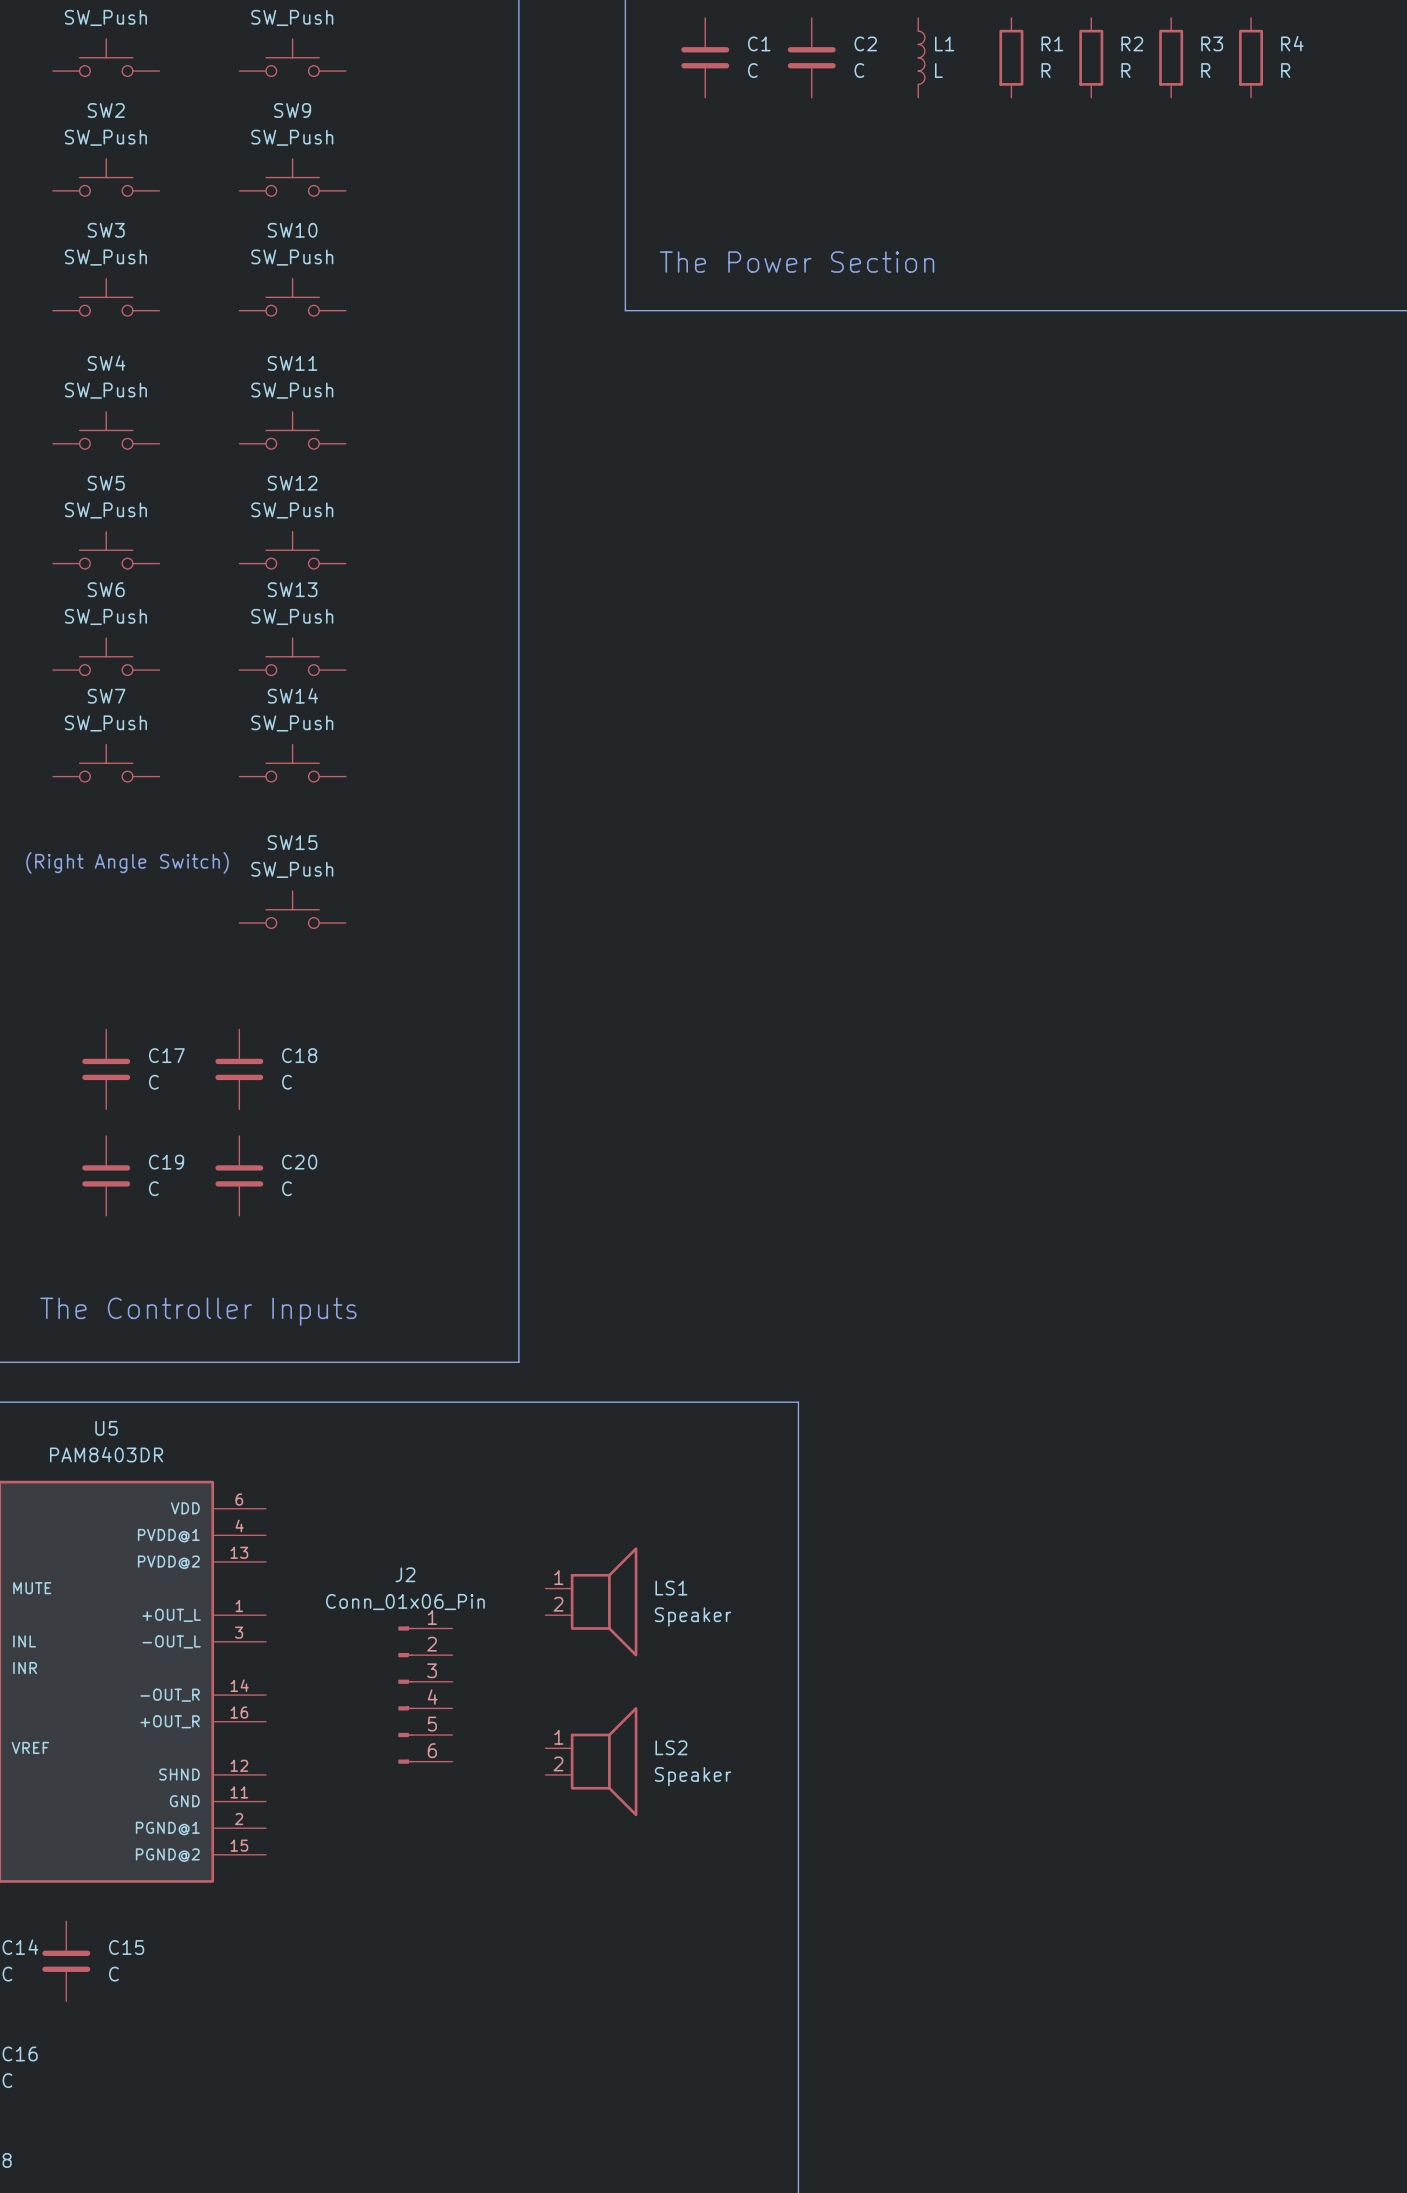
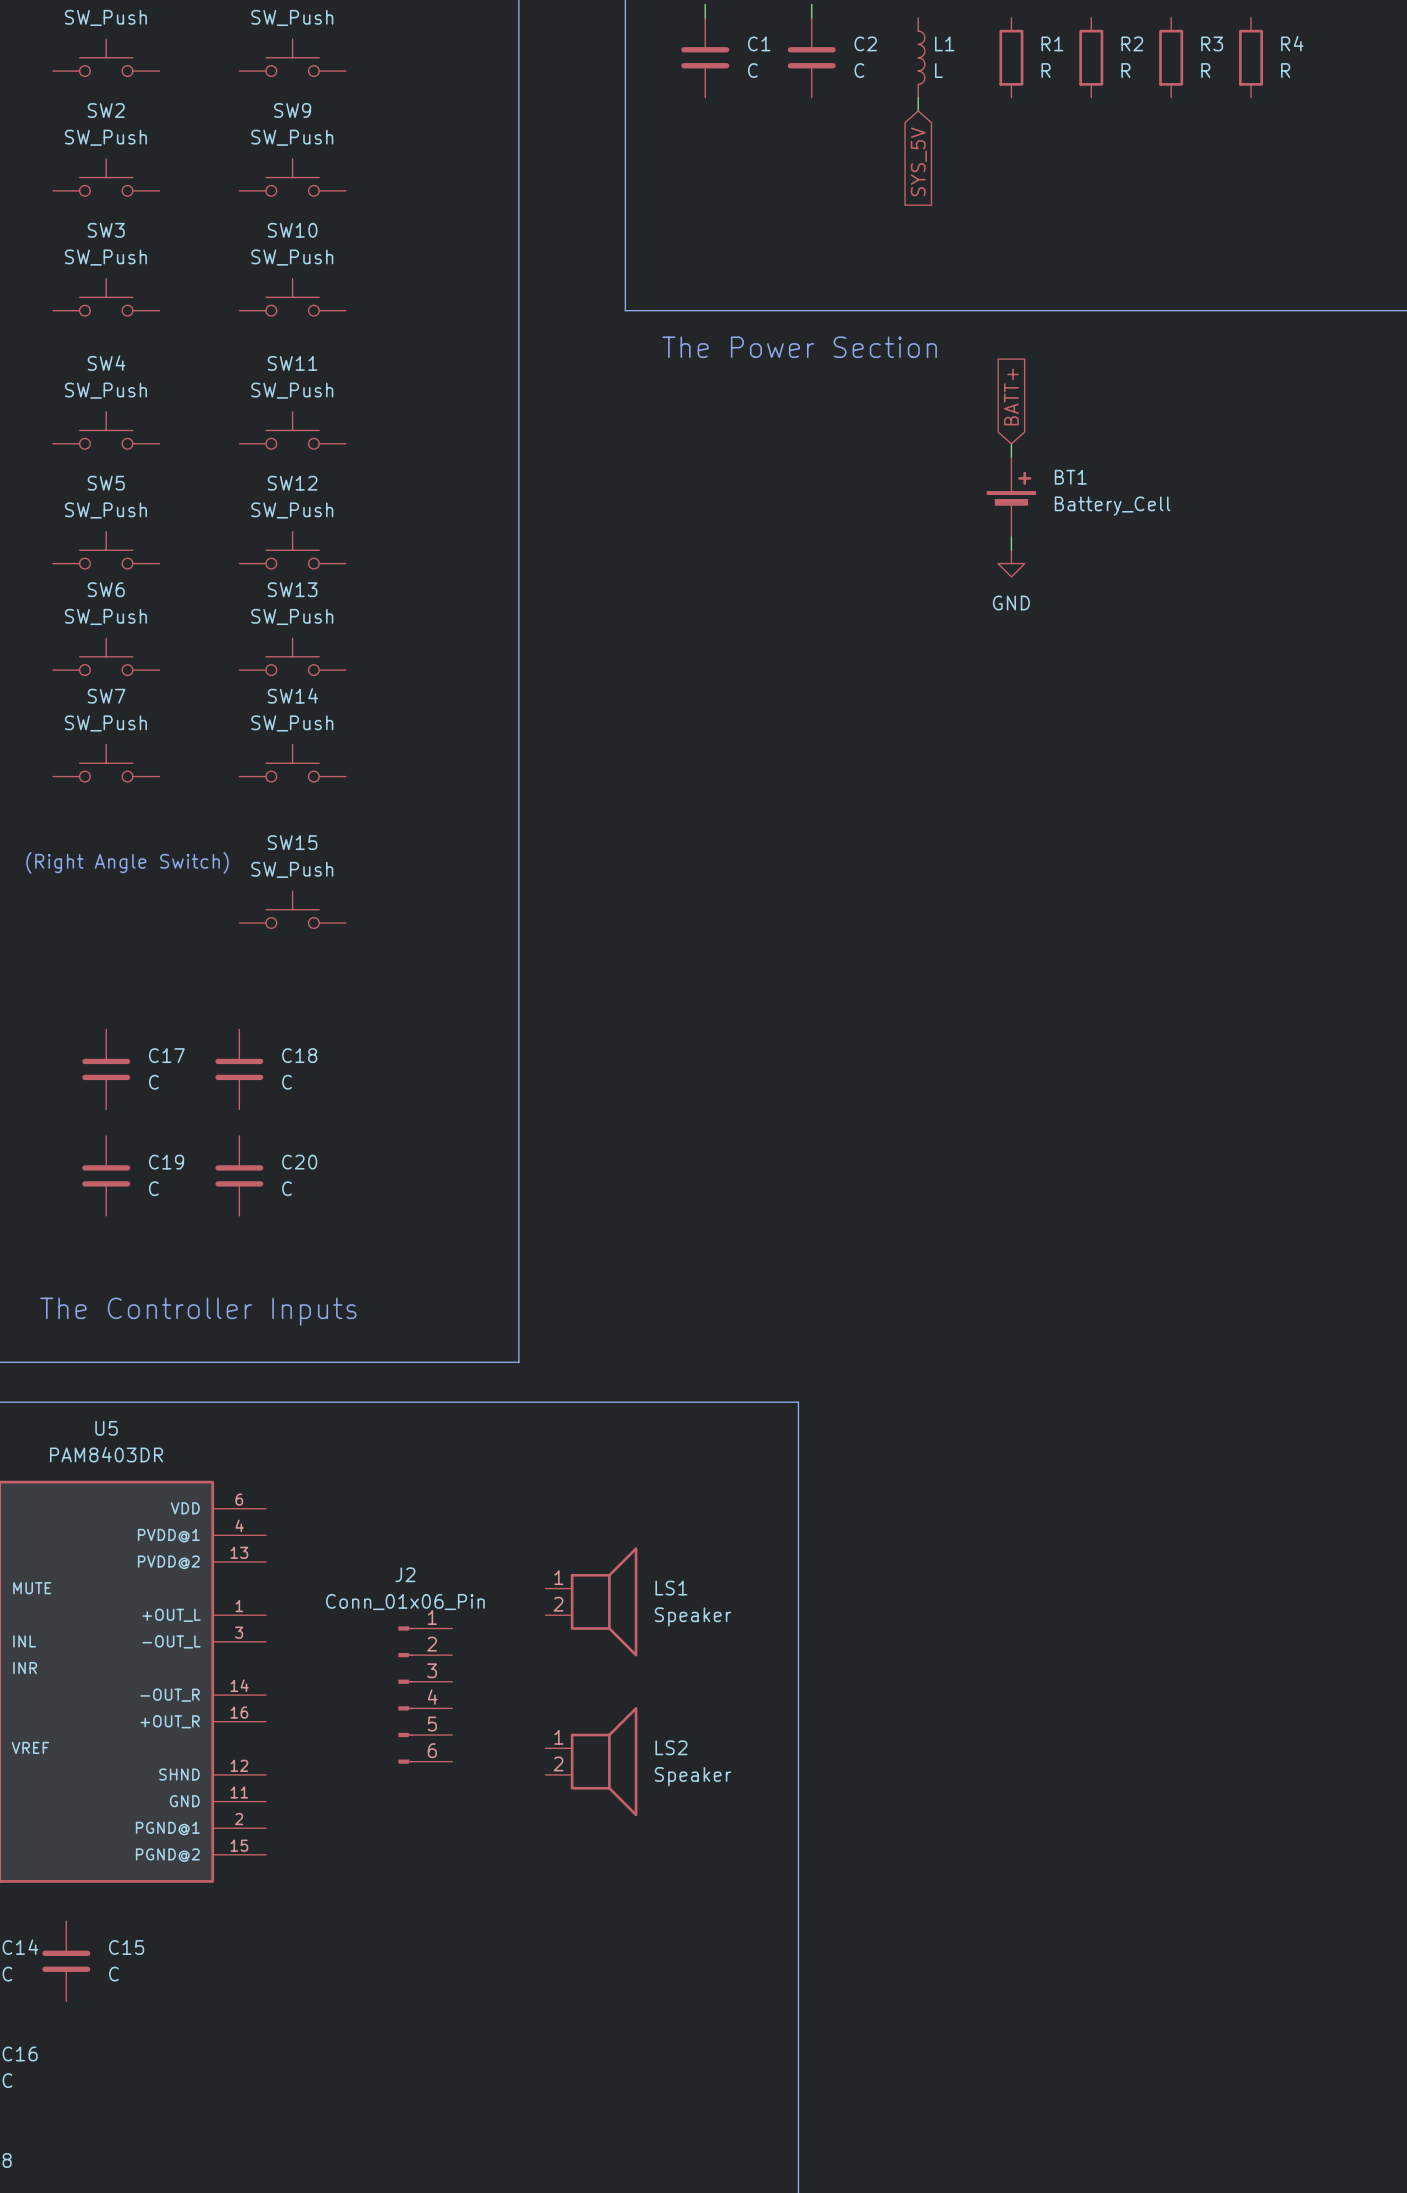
wire: none -> (705, 4) (705, 17)
wire: none -> (811, 4) (811, 17)
wire: none -> (918, 97) (918, 110)
global label: none -> SYS_5V (918, 161)
text position: The Power Section (797, 262) -> The Power Section (799, 347)
global label: none -> BATT+ (1011, 397)
wire: none -> (1011, 443) (1011, 457)
BT1: none -> Battery_Cell (1011, 497)
wire: none -> (1011, 536) (1011, 550)
power symbol: none -> GND (1011, 563)

